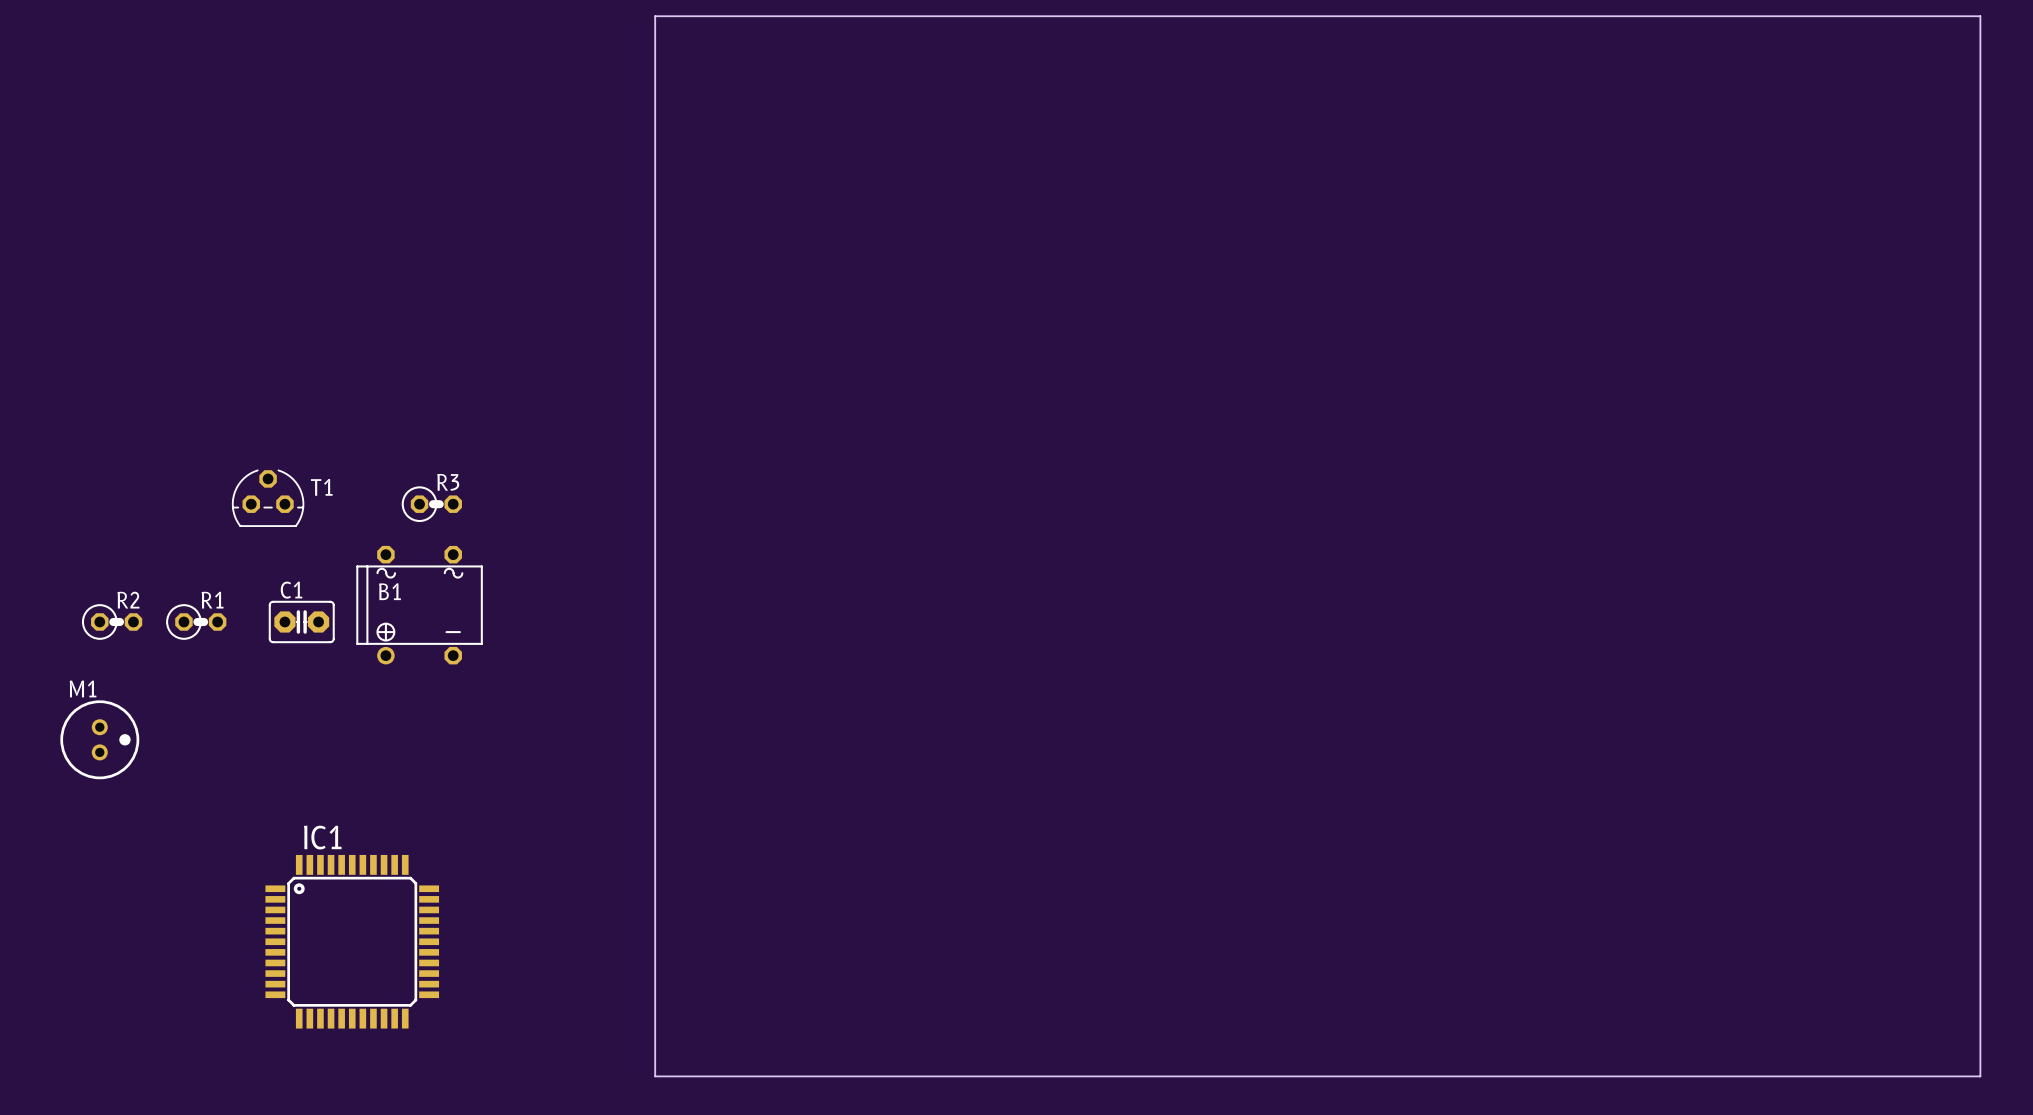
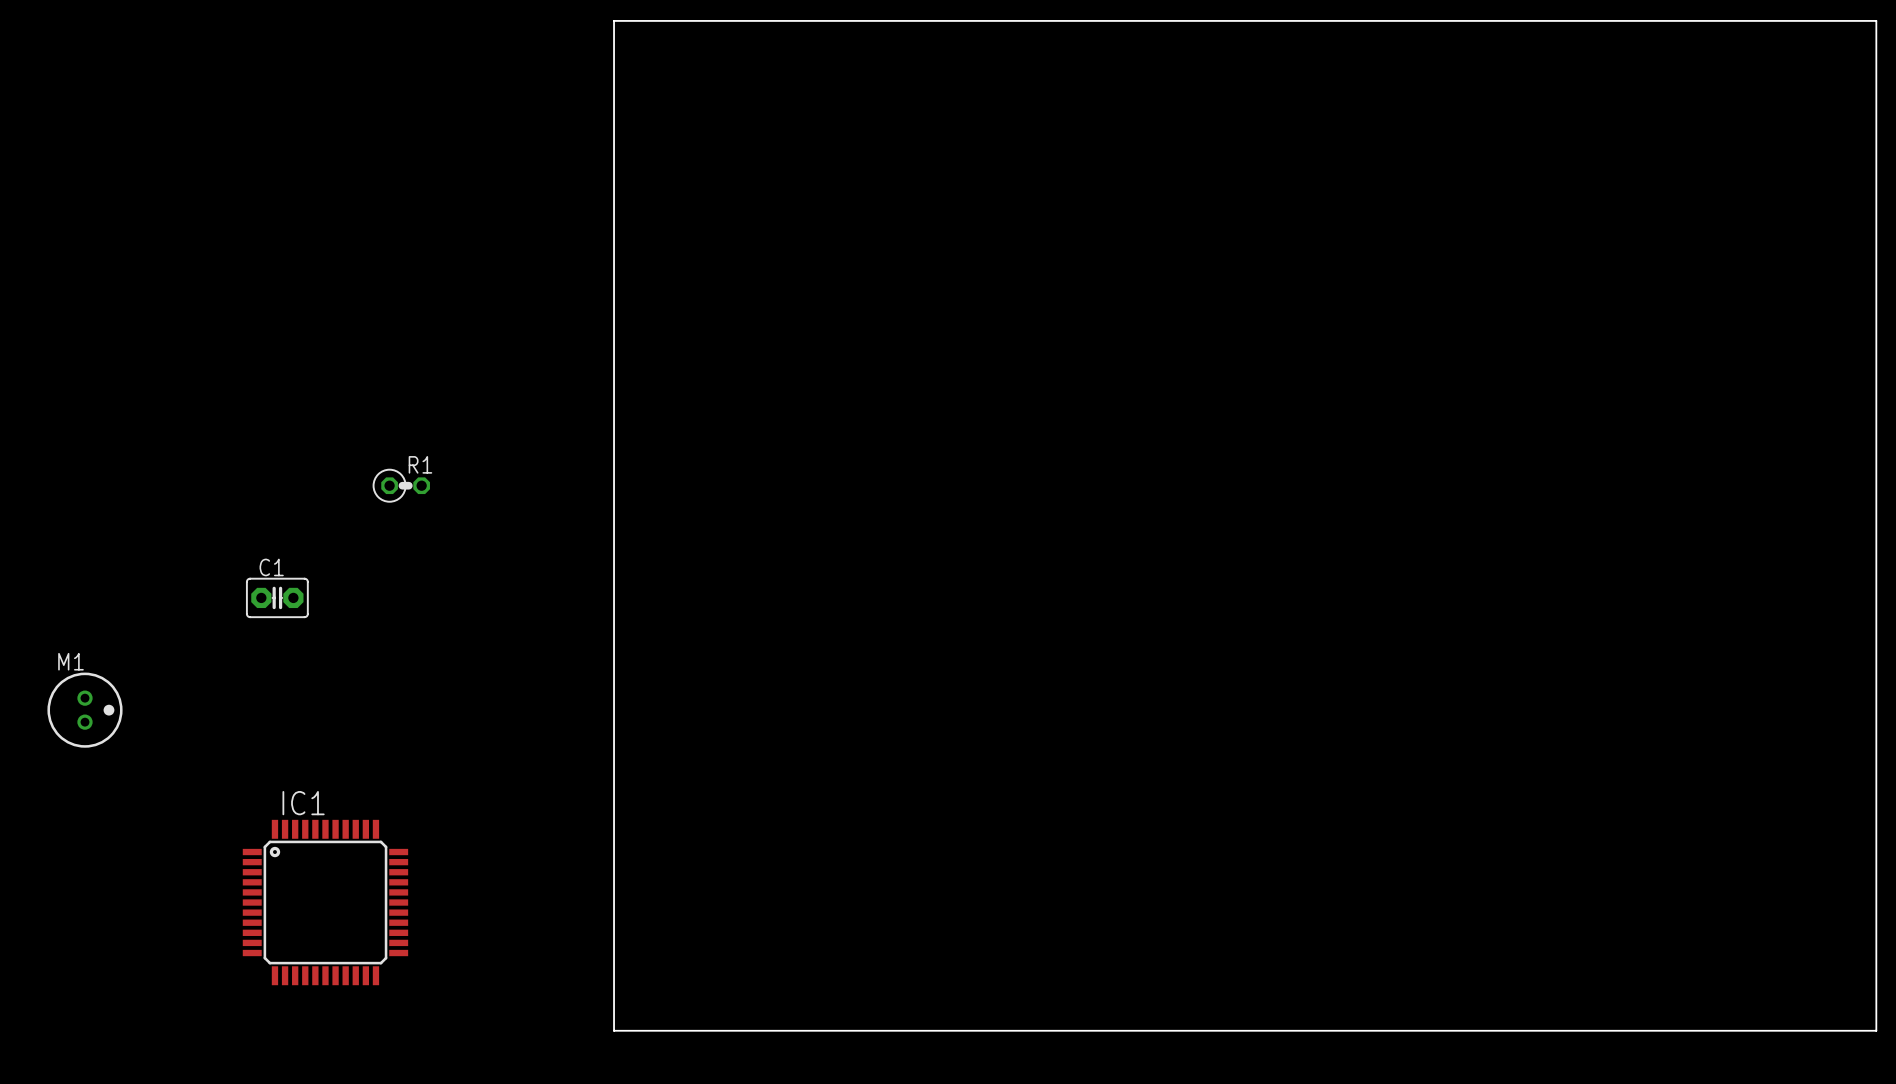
R3 name: R3 (448, 482) -> R1 (420, 464)
T1: (268, 498) -> none
B1: (419, 605) -> none
R2: (112, 621) -> none
R1: (196, 621) -> none

